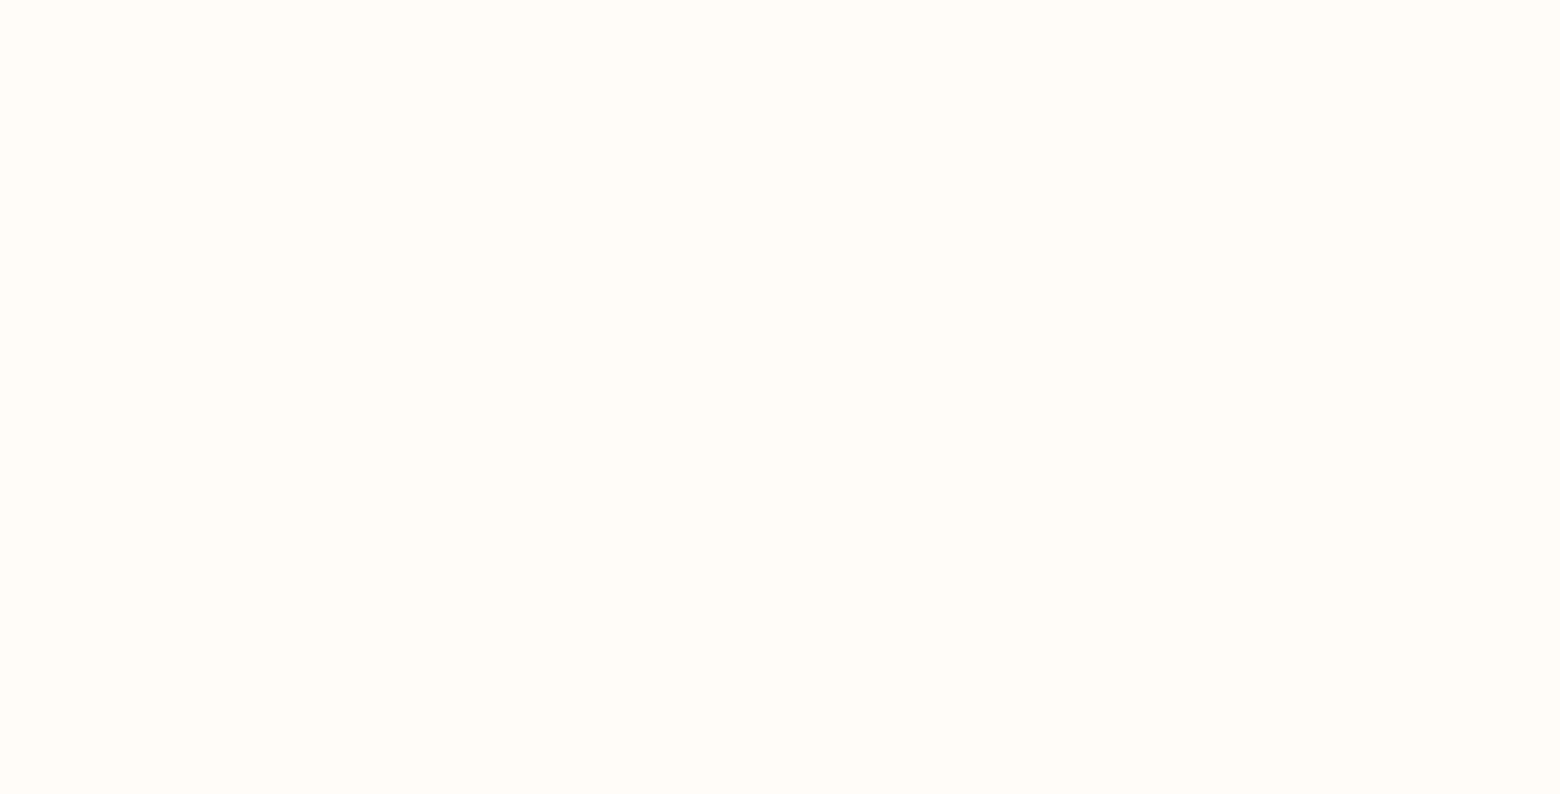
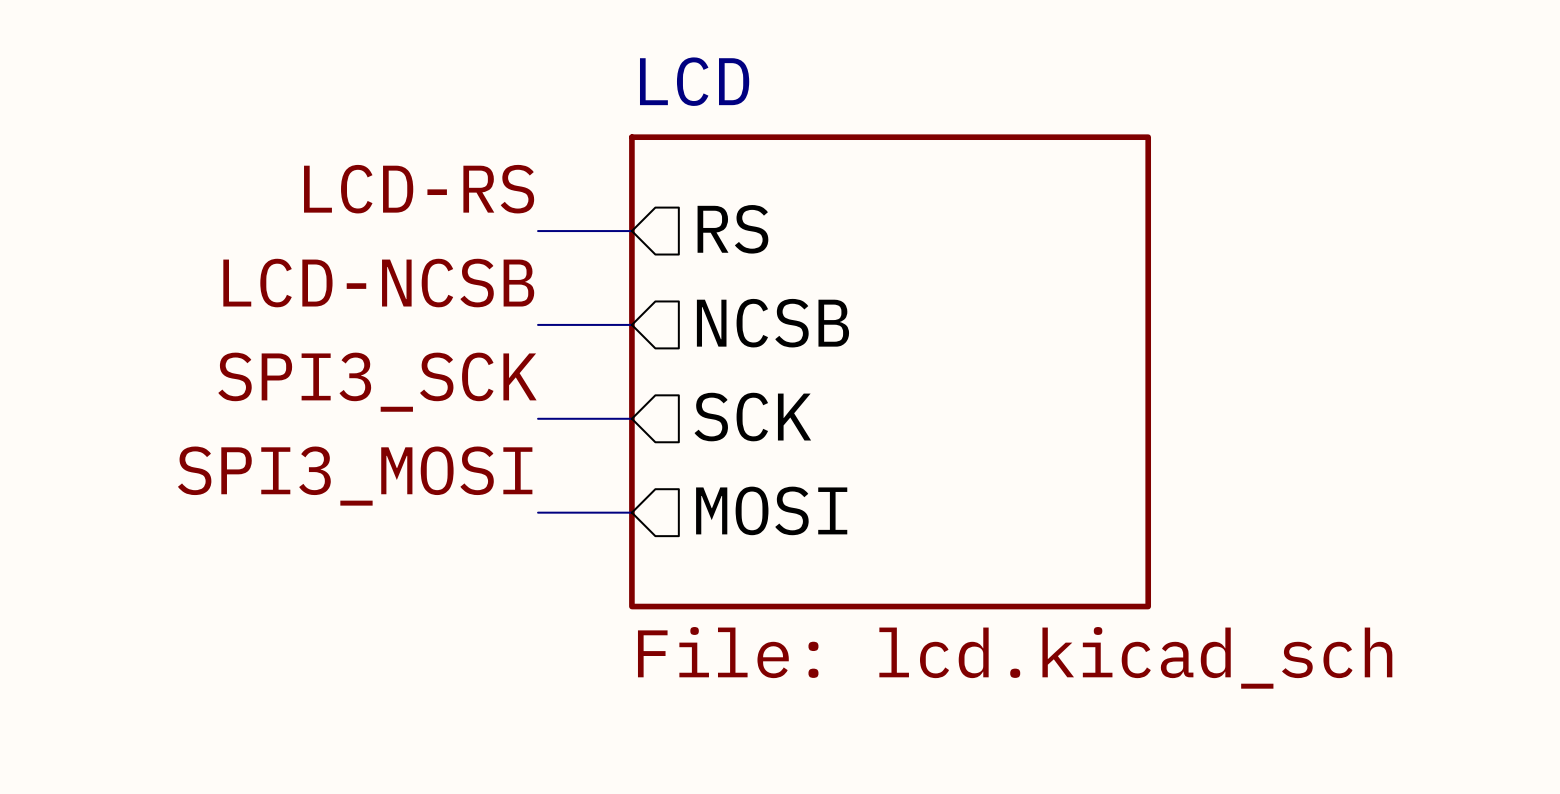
label: none -> LCD-RS (419, 189)
sheet pin: none -> RS (732, 229)
wire: none -> (538, 231) (631, 231)
label: none -> LCD-NCSB (378, 283)
sheet pin: none -> NCSB (772, 323)
wire: none -> (538, 324) (631, 324)
sheet LCD: none -> File: lcd.kicad_sch (890, 371)
label: none -> SPI3_SCK (377, 382)
sheet pin: none -> SCK (752, 417)
wire: none -> (538, 418) (631, 418)
label: none -> SPI3_MOSI (355, 476)
sheet pin: none -> MOSI (771, 510)
wire: none -> (538, 512) (631, 512)

